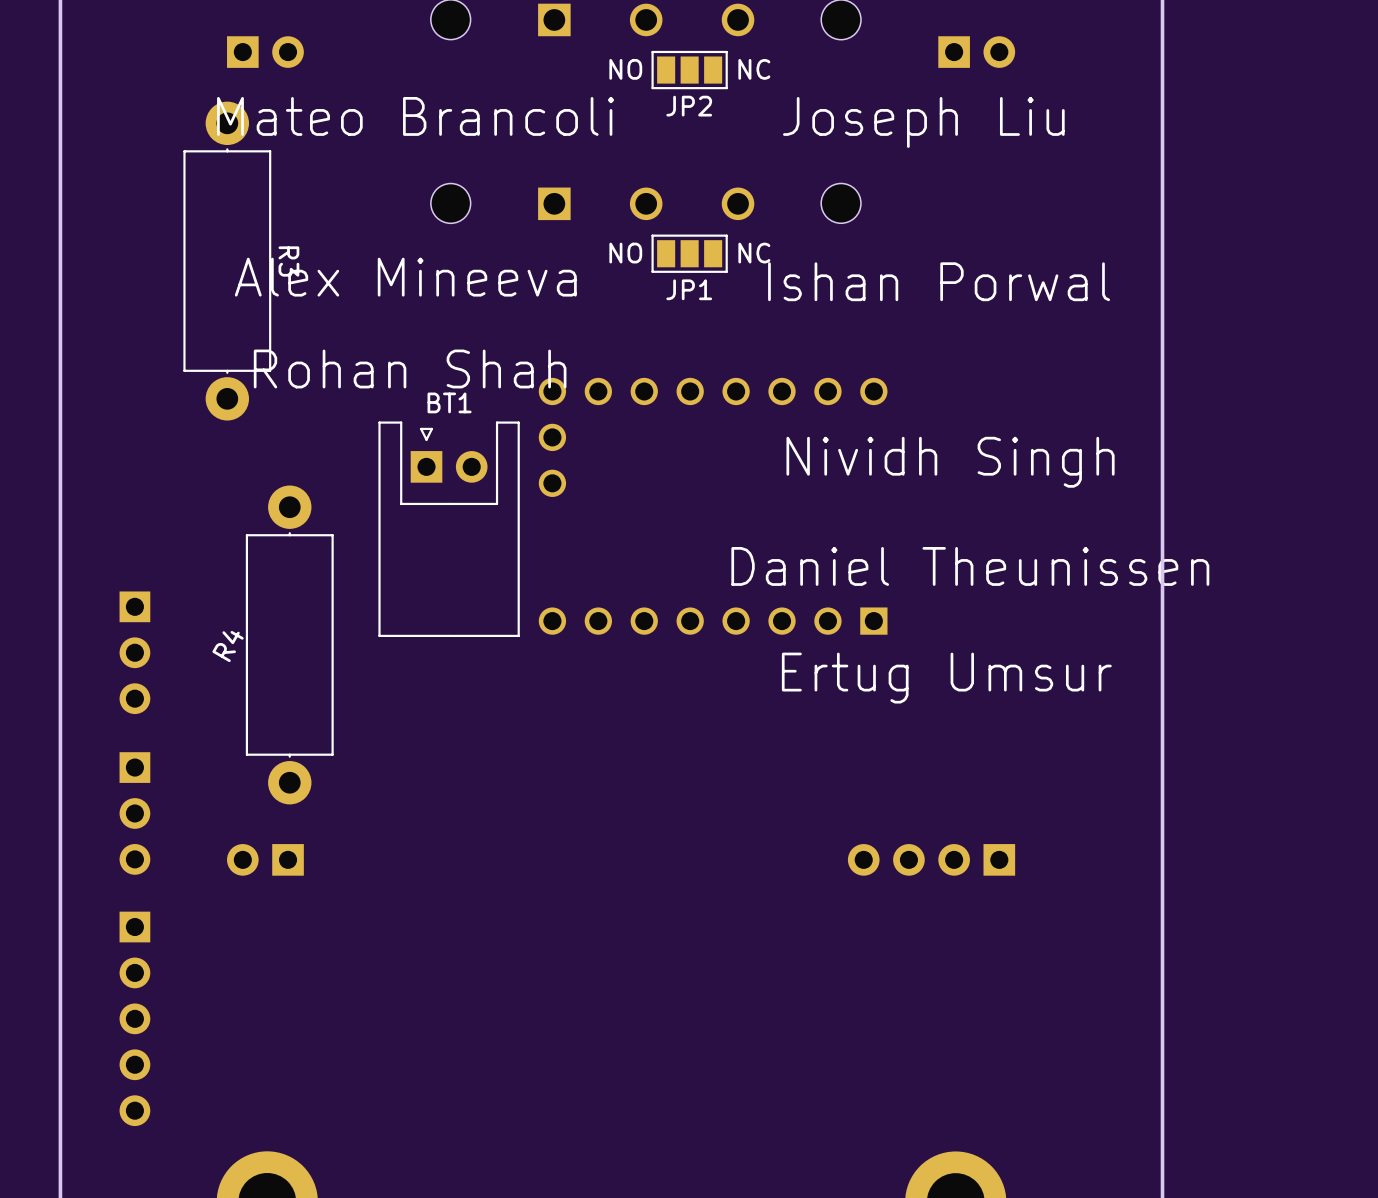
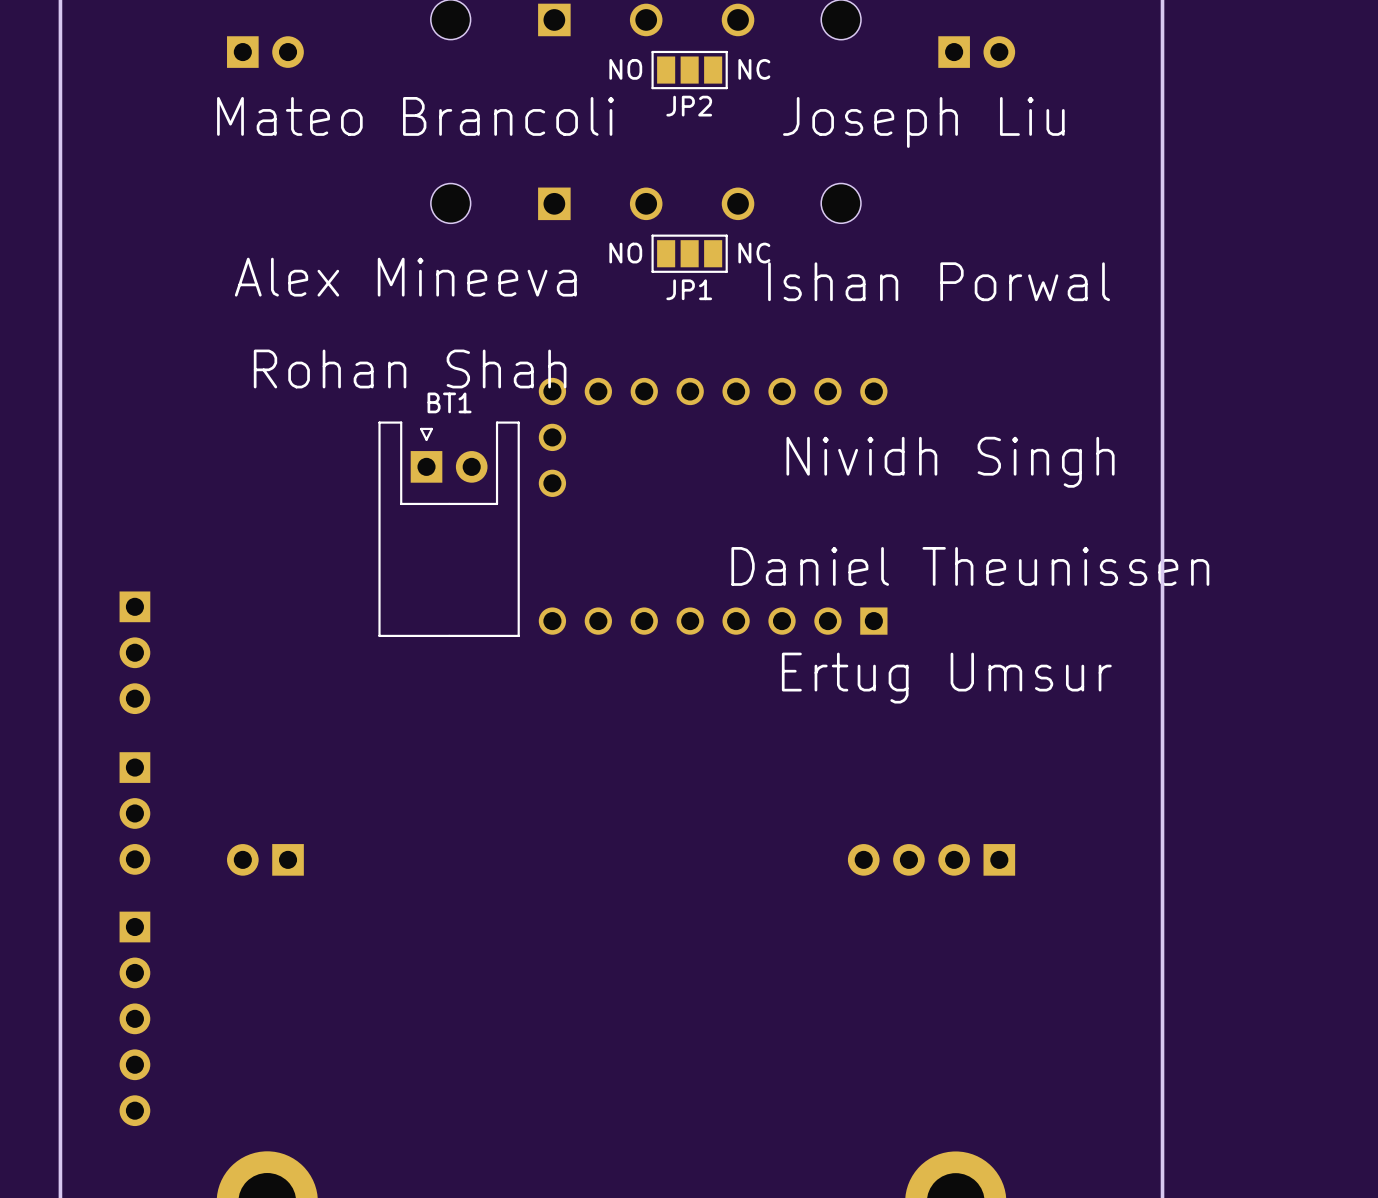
R3: (227, 261) -> none
R4: (289, 644) -> none

